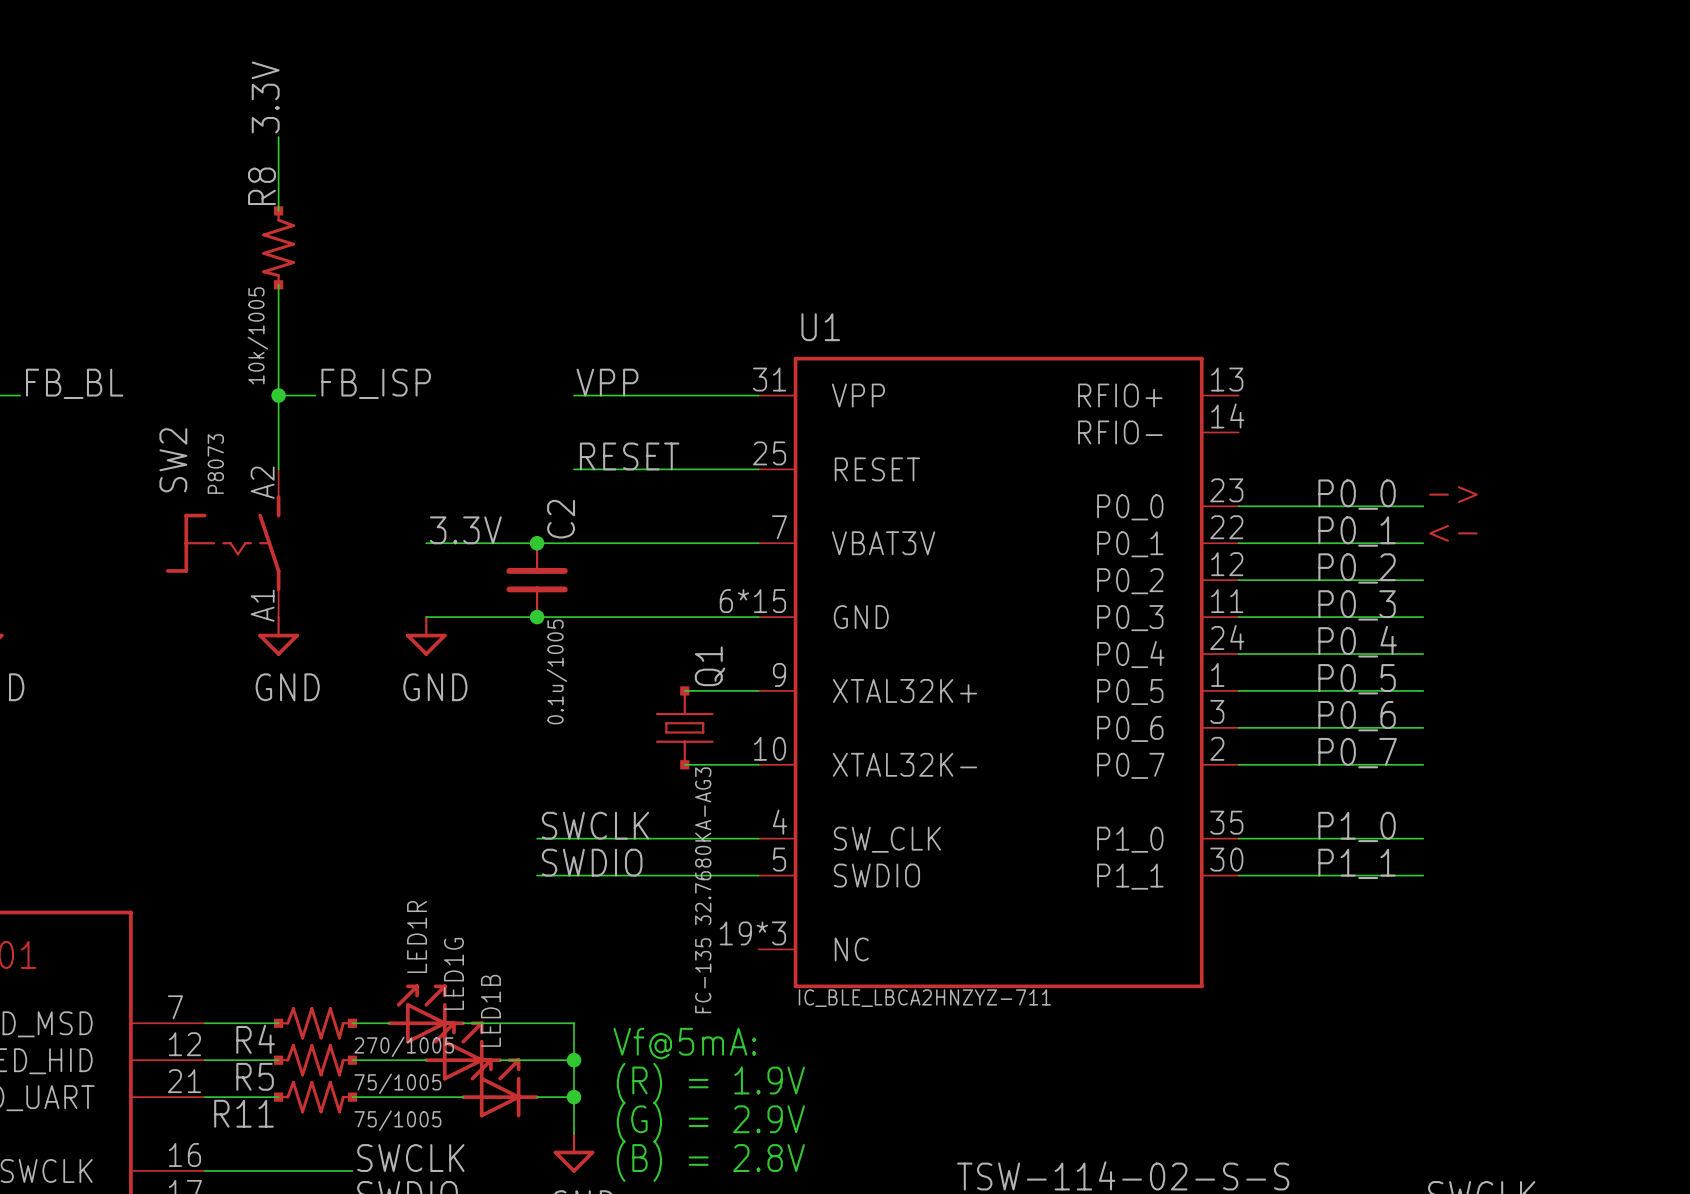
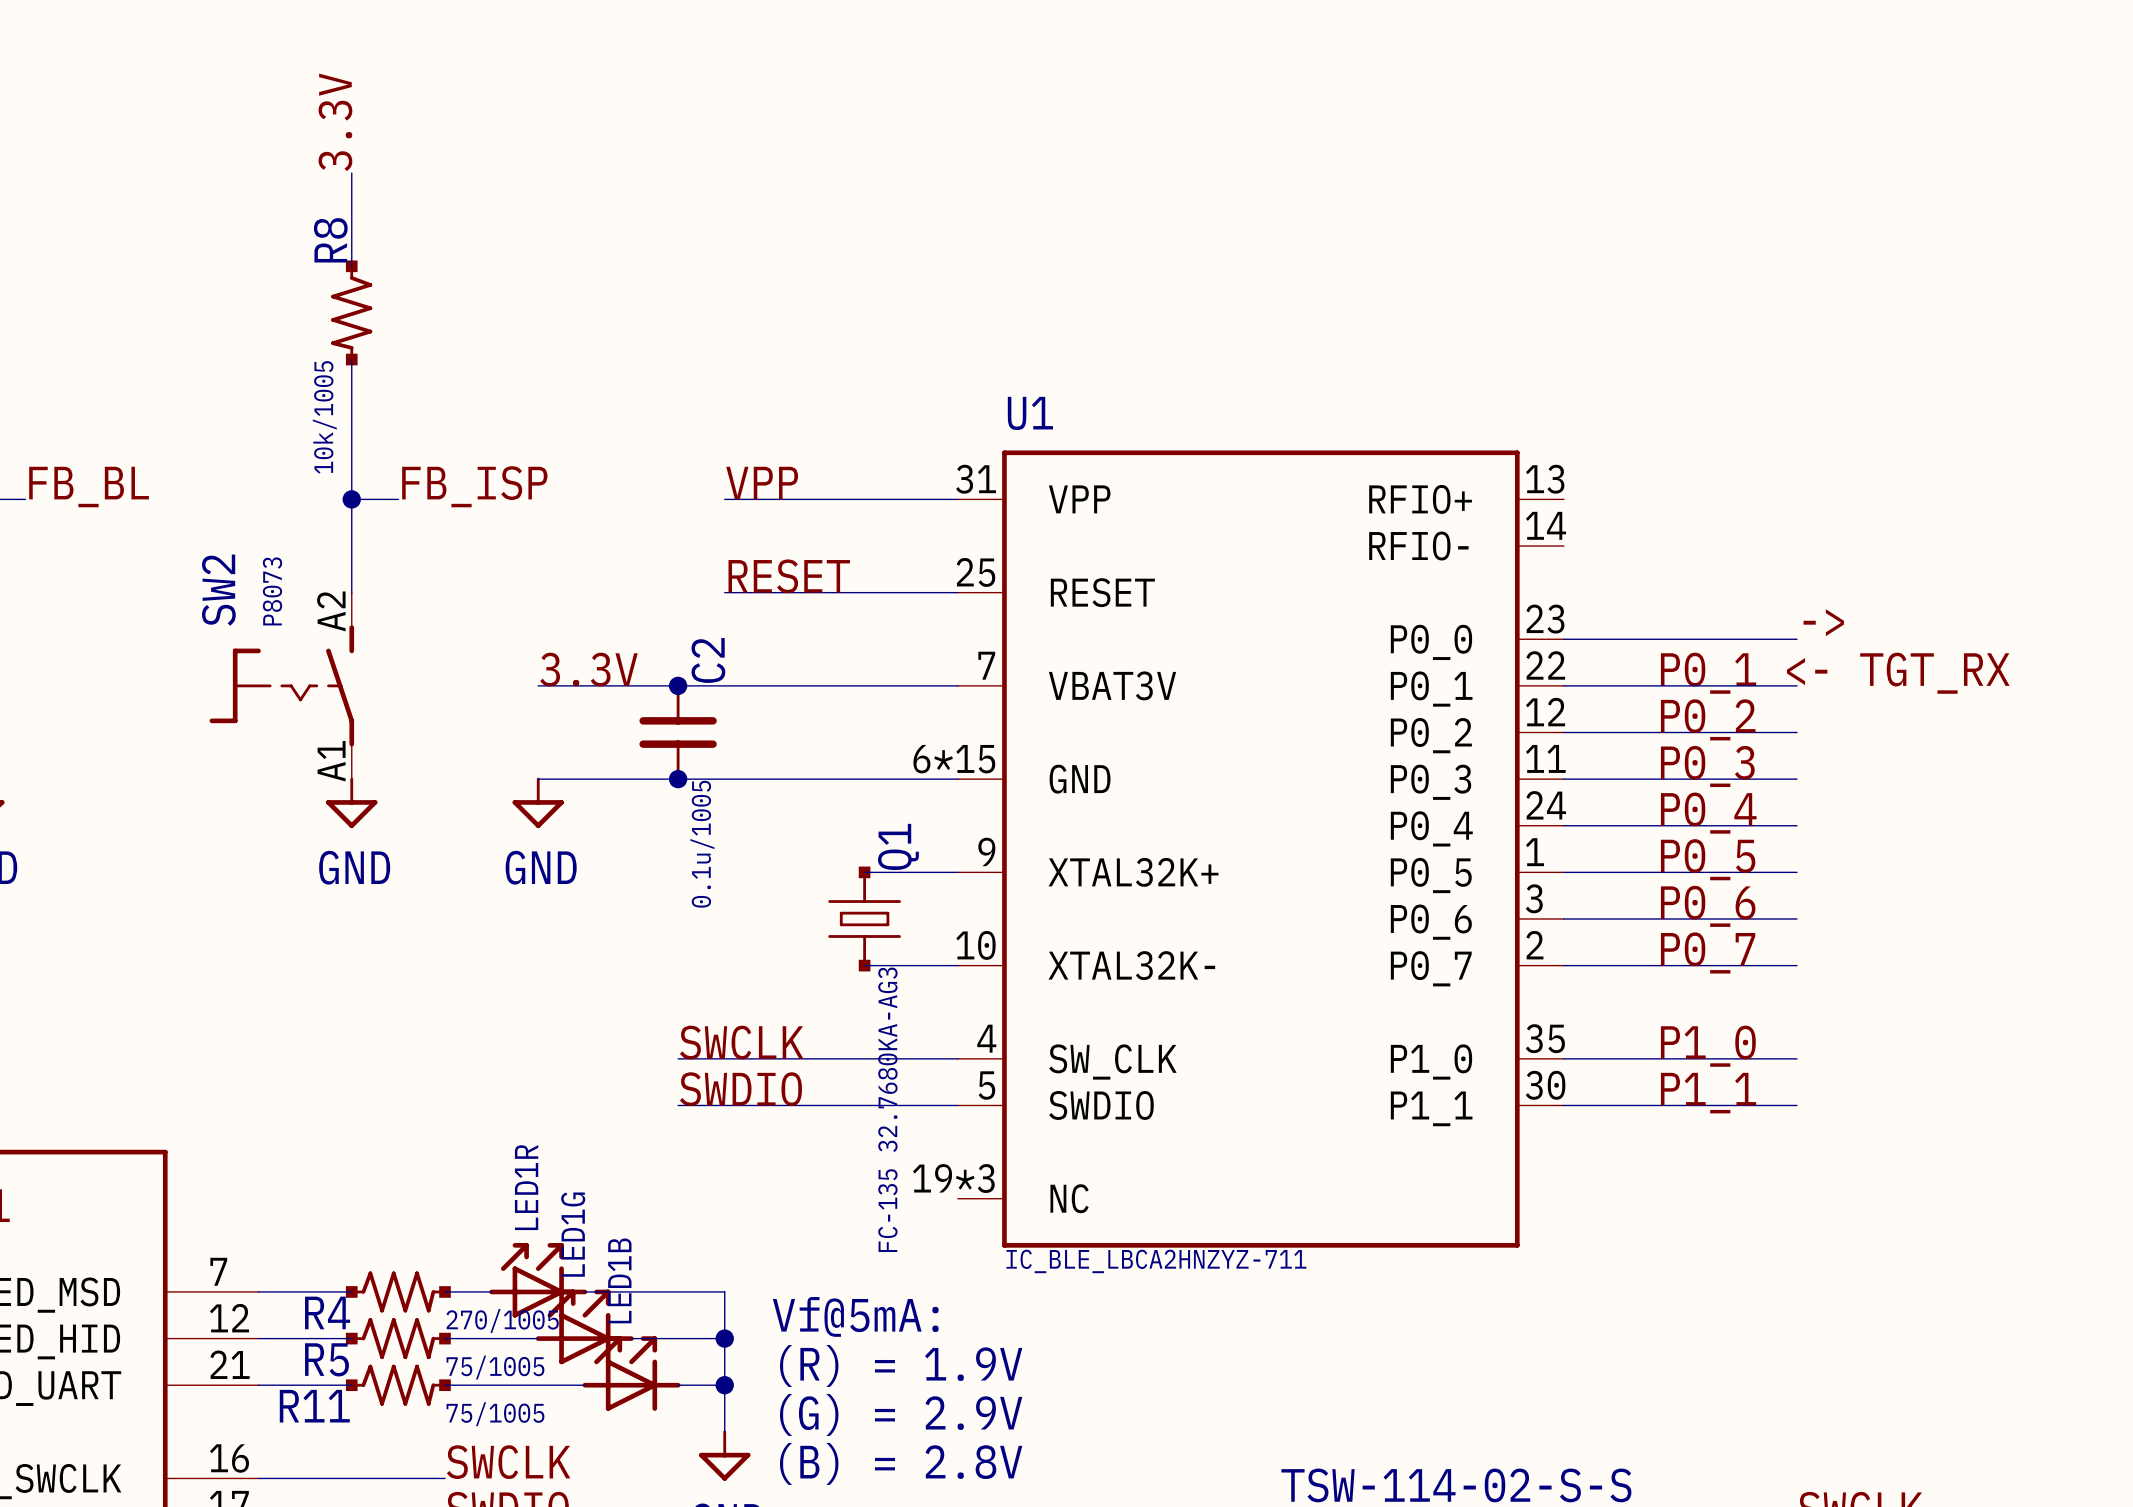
label: P0_0 (1357, 494) -> none
label: P0_1 (1357, 531) -> none
text: none -> P0_1 <- TGT_RX (1835, 673)
text: <- (1453, 533) -> none

